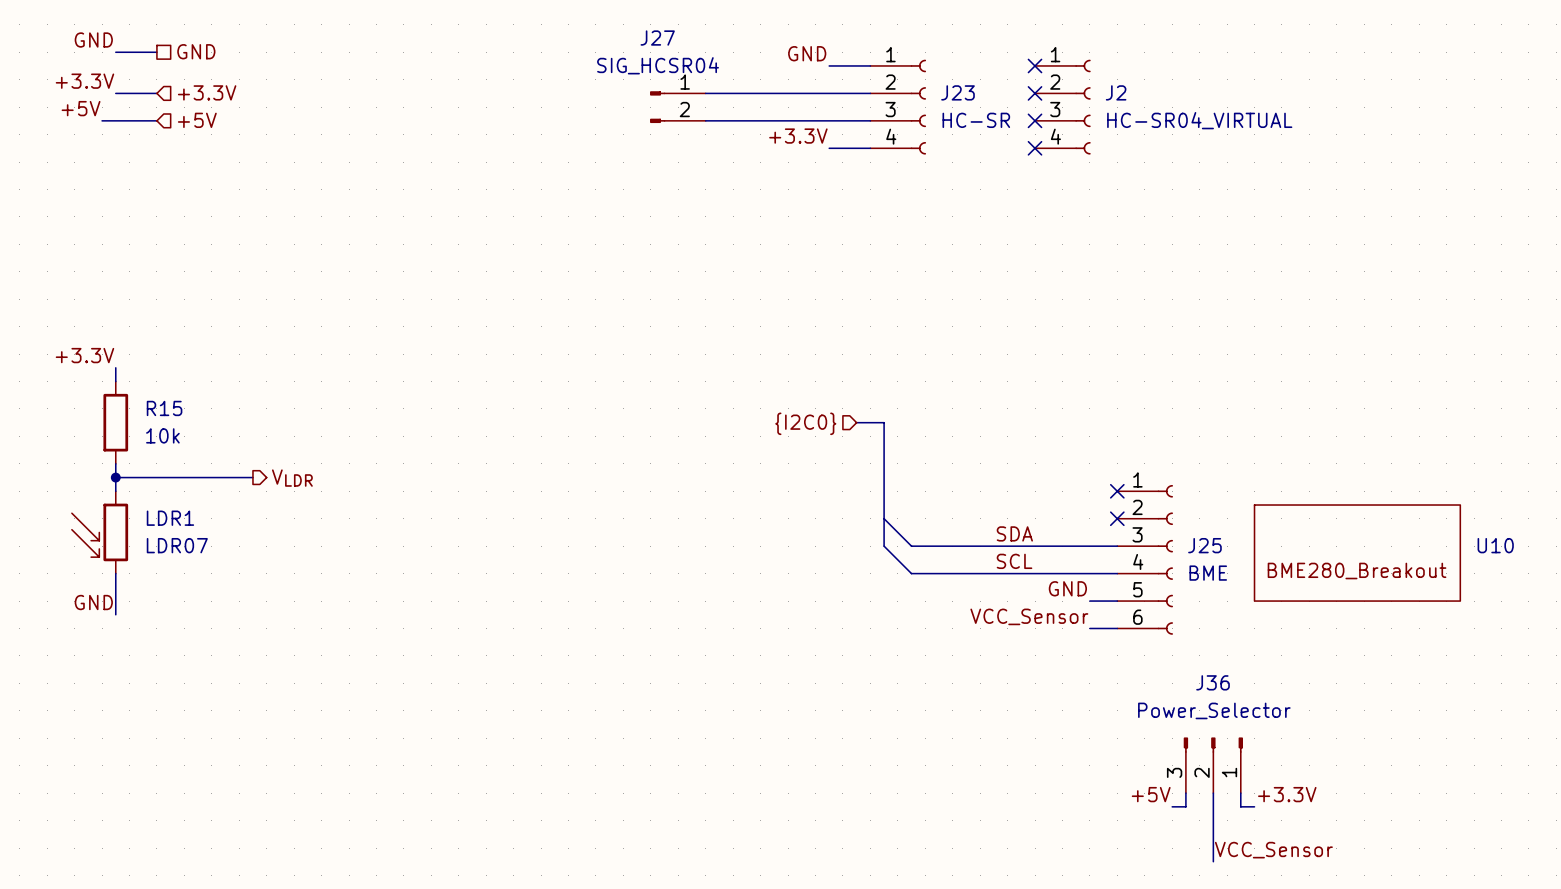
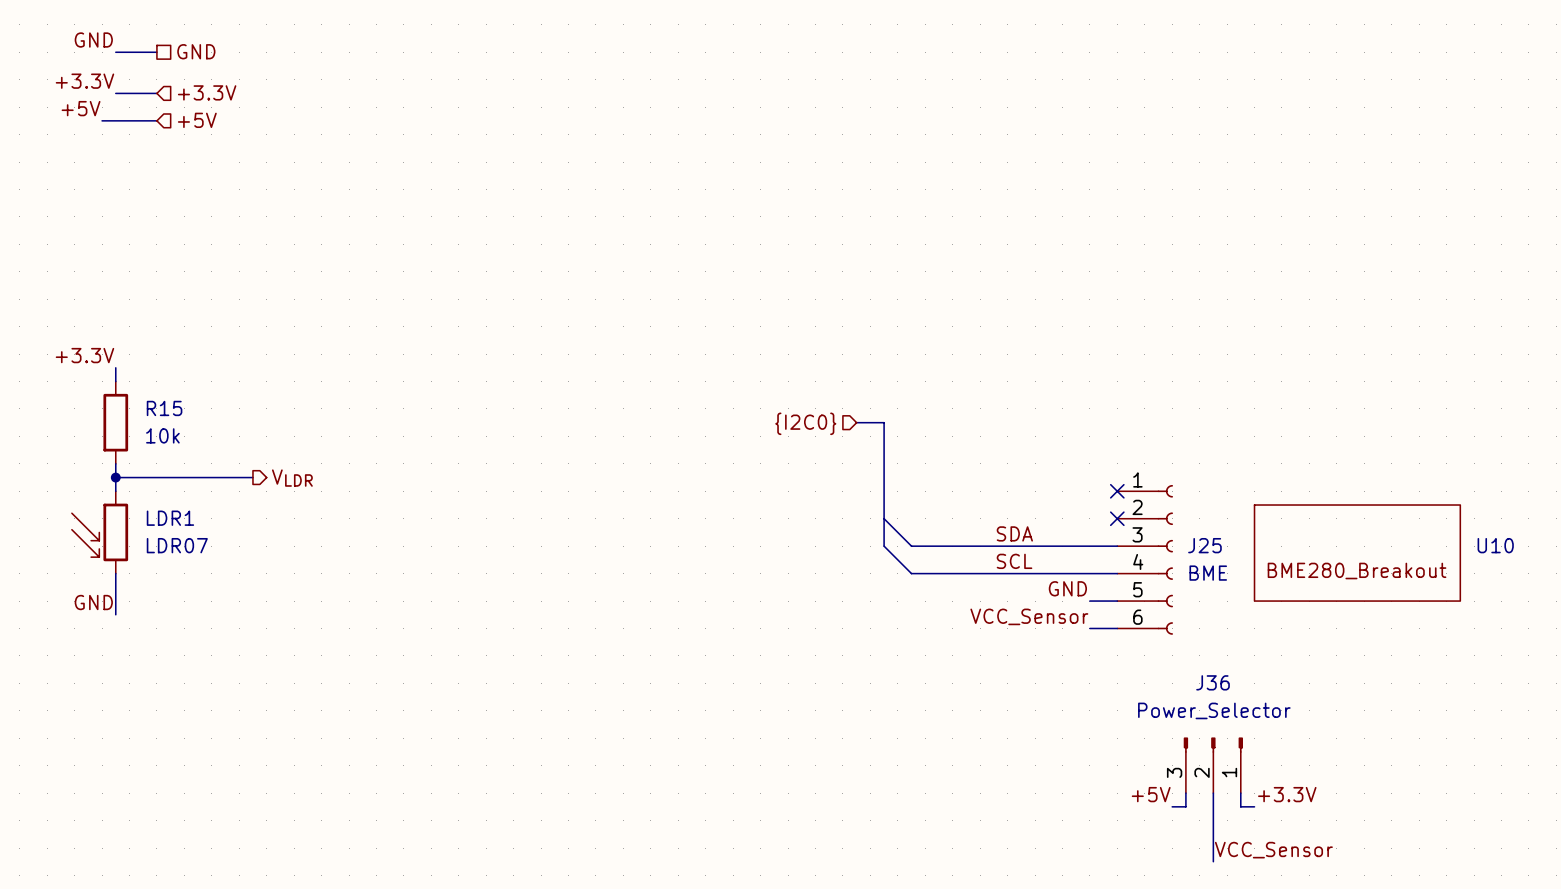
label: GND (807, 53) -> none
wire: (829, 65) (870, 65) -> none
no-connect mark: (1035, 65) -> none
wire: (705, 93) (870, 93) -> none
no-connect mark: (1035, 93) -> none
J27: SIG_HCSR04 (677, 107) -> none
J23: HC-SR (898, 107) -> none
J2: HC-SR04_VIRTUAL (1062, 107) -> none
wire: (705, 120) (870, 120) -> none
no-connect mark: (1035, 120) -> none
label: +3.3V (798, 136) -> none
wire: (829, 148) (870, 148) -> none
no-connect mark: (1035, 148) -> none

